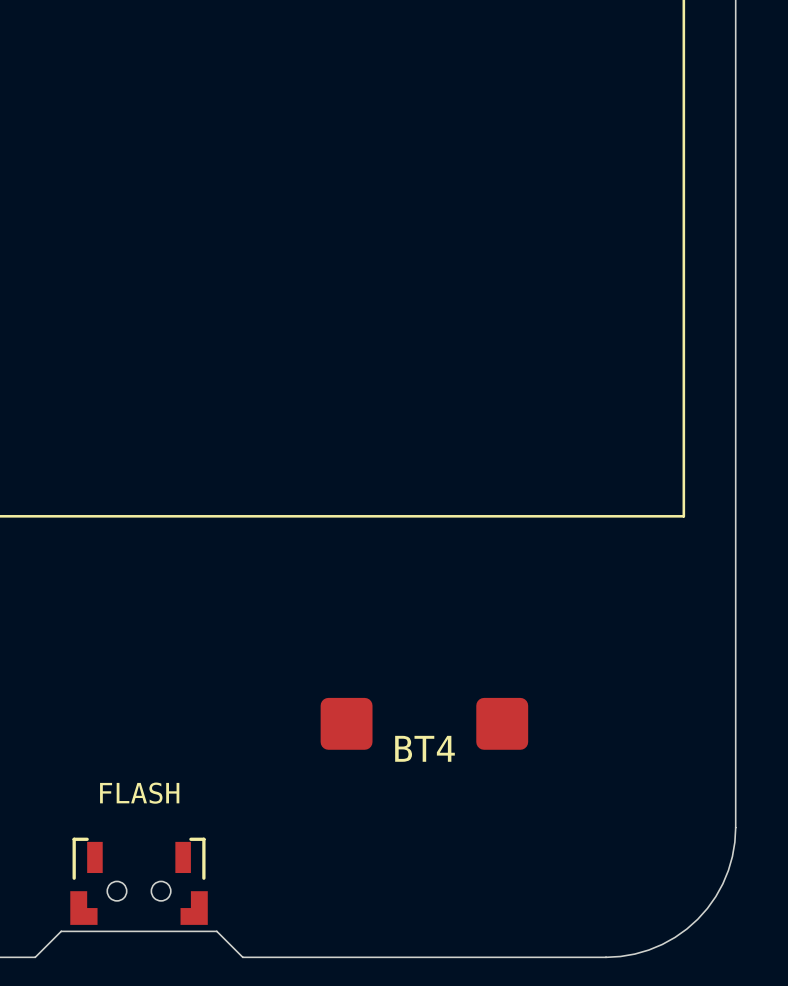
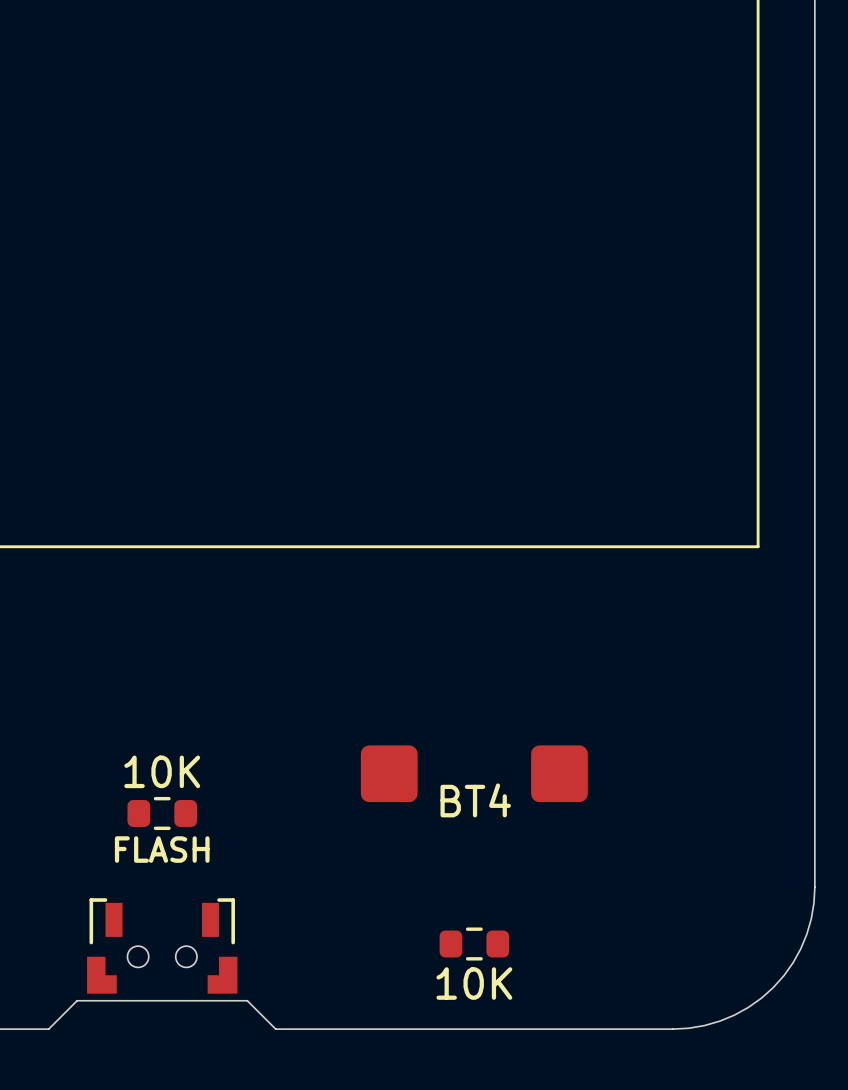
part: none -> 10K (162, 813)
part: none -> 10K (474, 944)

